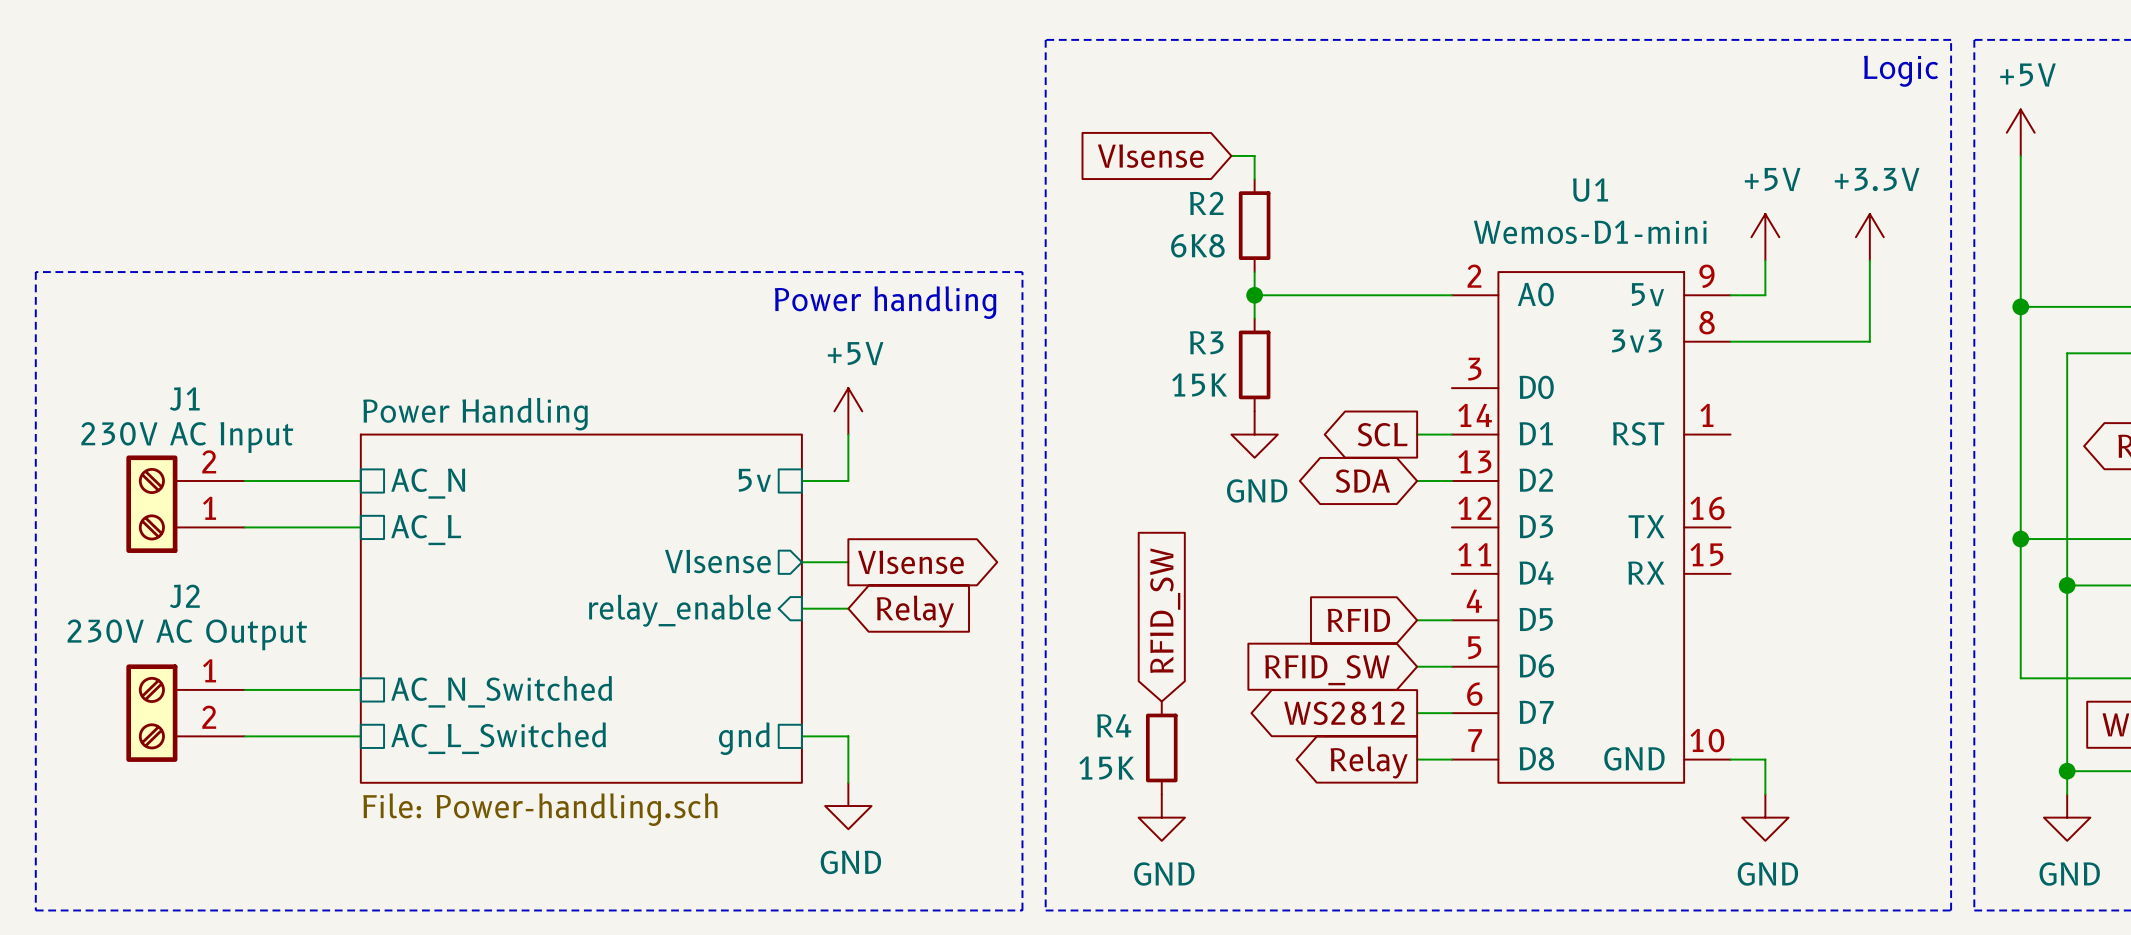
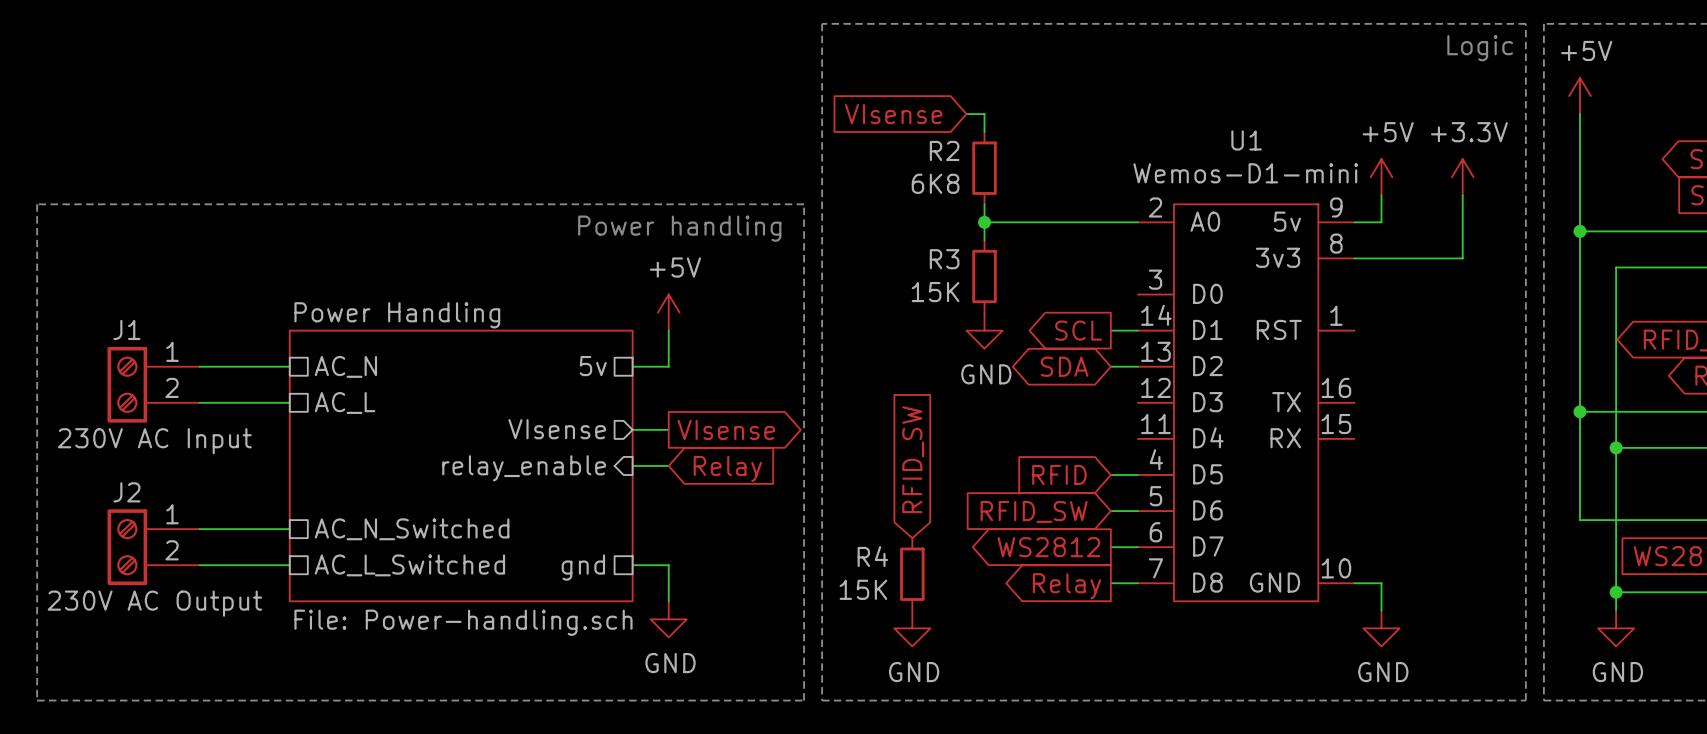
J1 name position: J1 (184, 399) -> J1 (126, 329)
J1 flip: as is (151, 504) -> up-down (127, 384)
J2 name position: J2 (184, 596) -> J2 (126, 492)
J2 value position: 230V AC Output (187, 634) -> 230V AC Output (154, 603)

